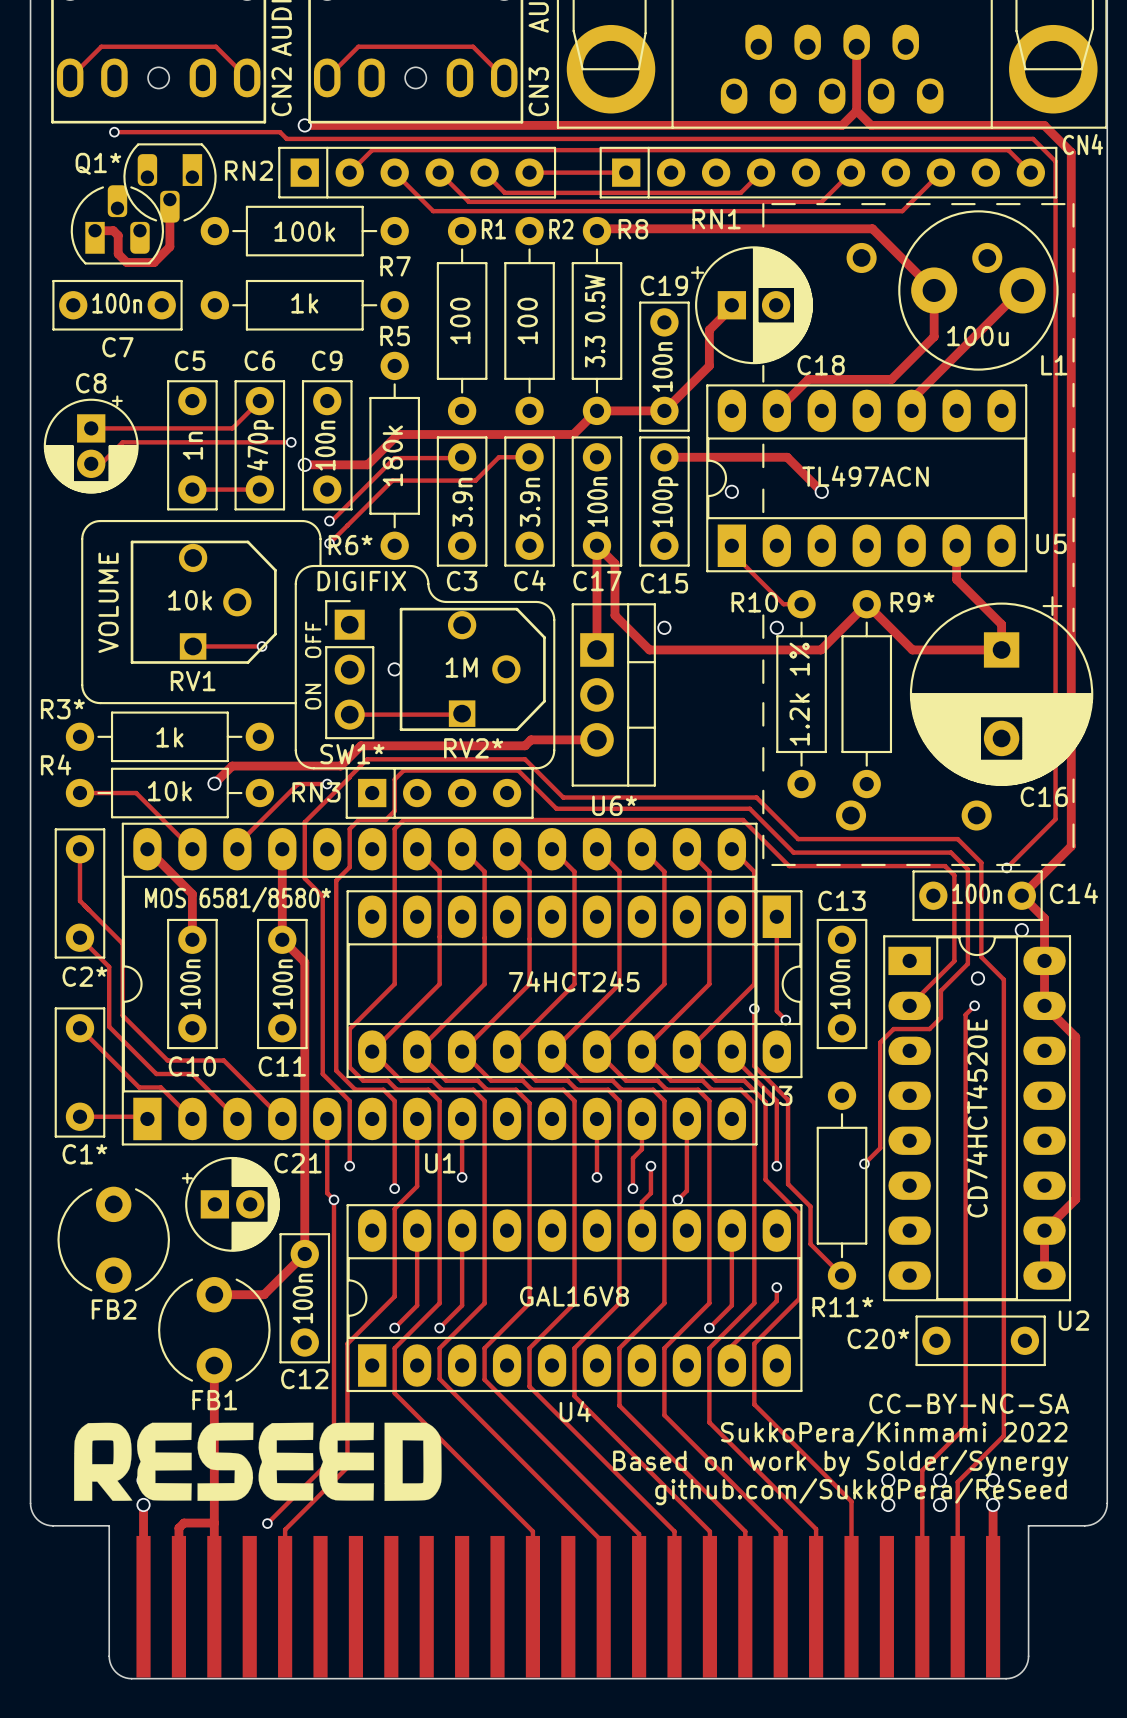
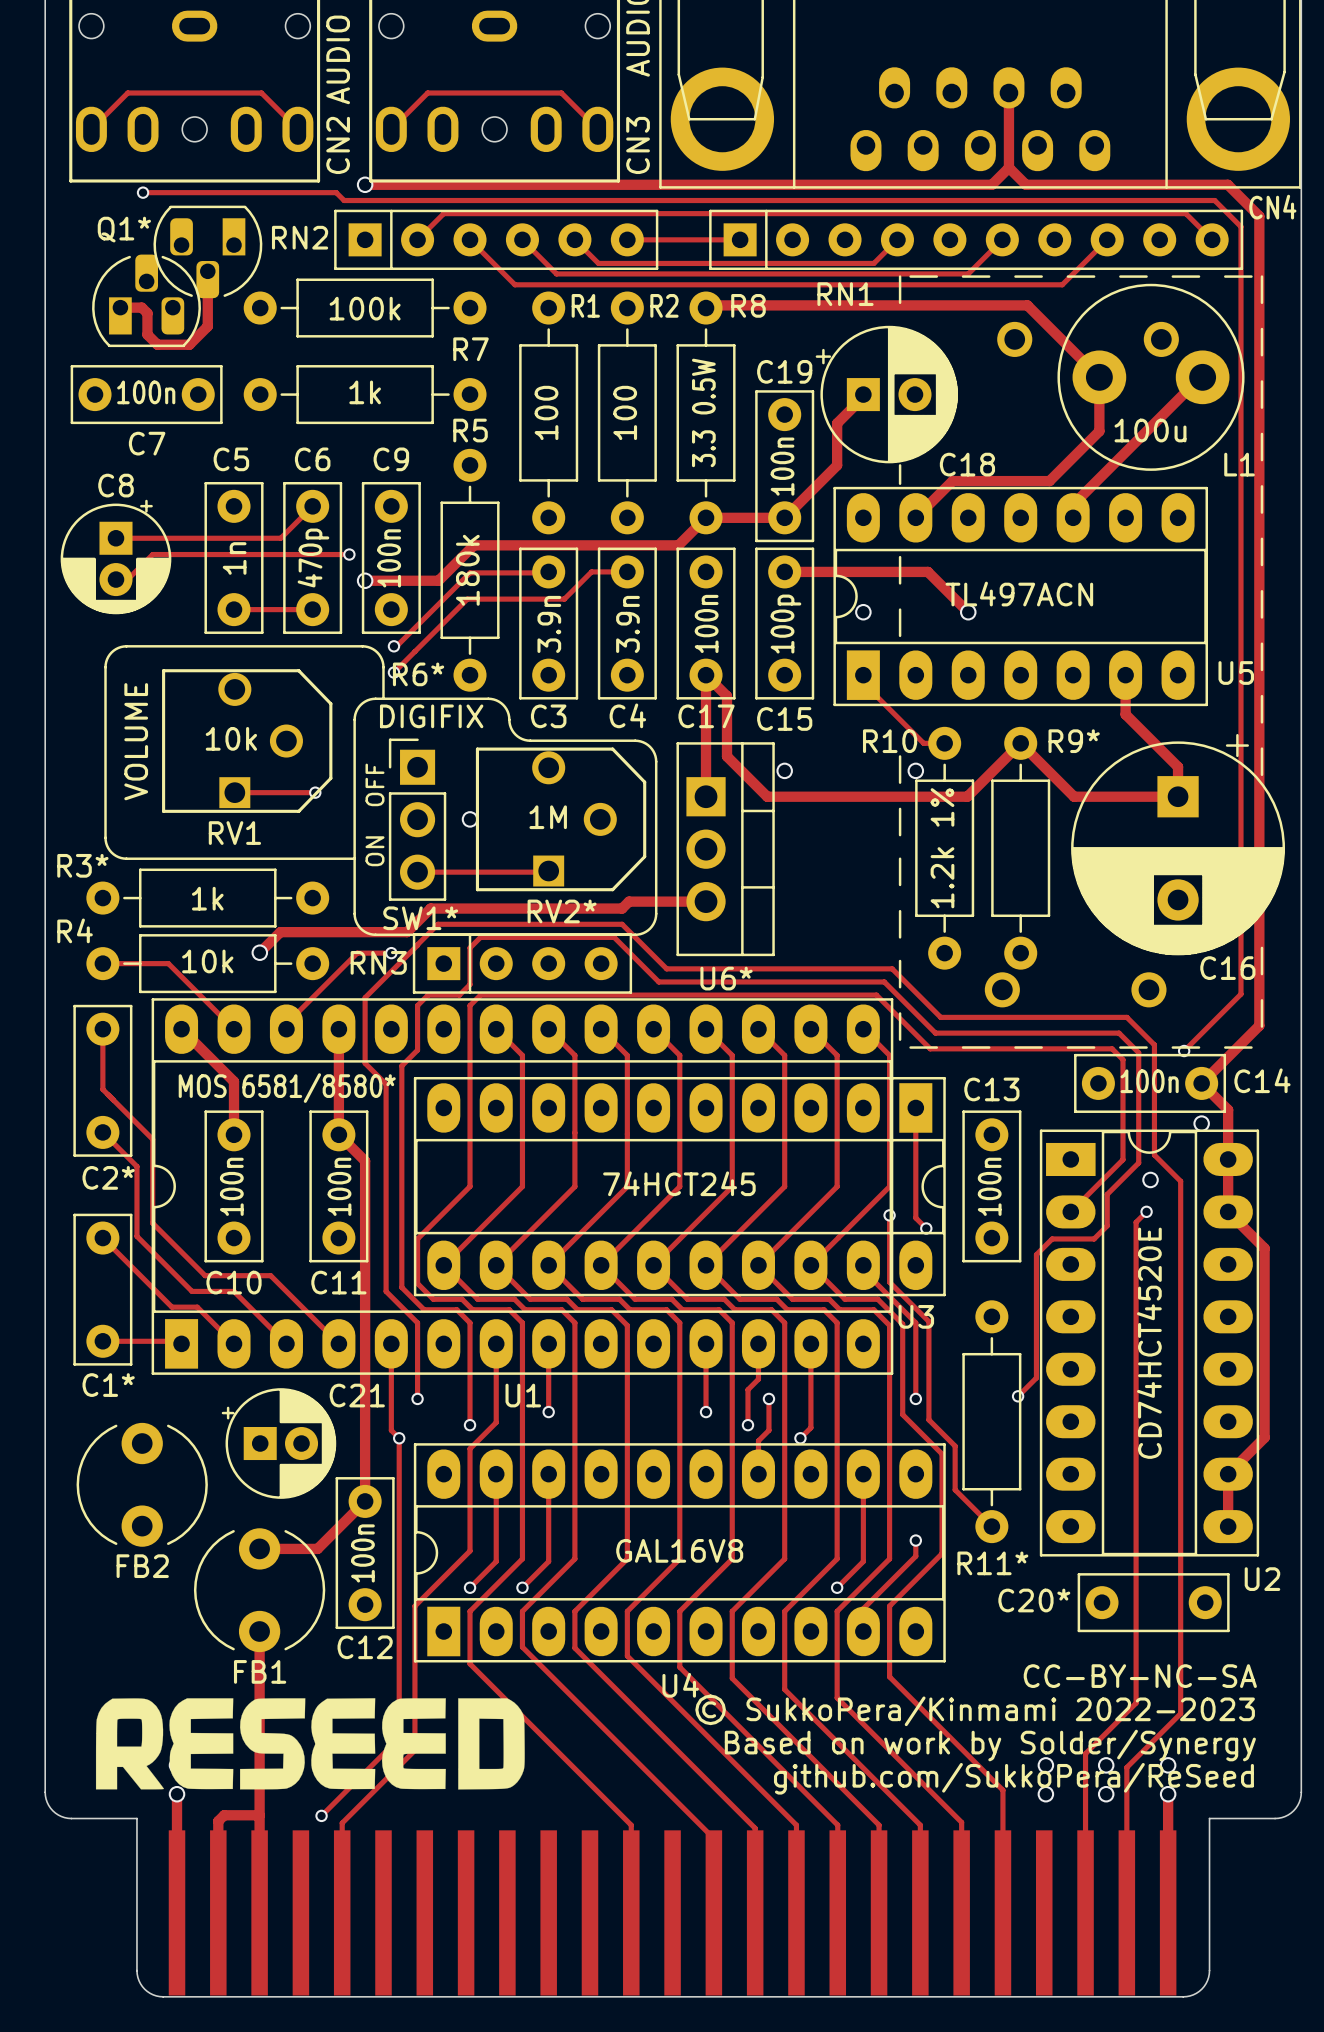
text: SukkoPera/Kinmami 2022 (894, 1433) -> © SukkoPera/Kinmami 2022-2023 (975, 1710)

